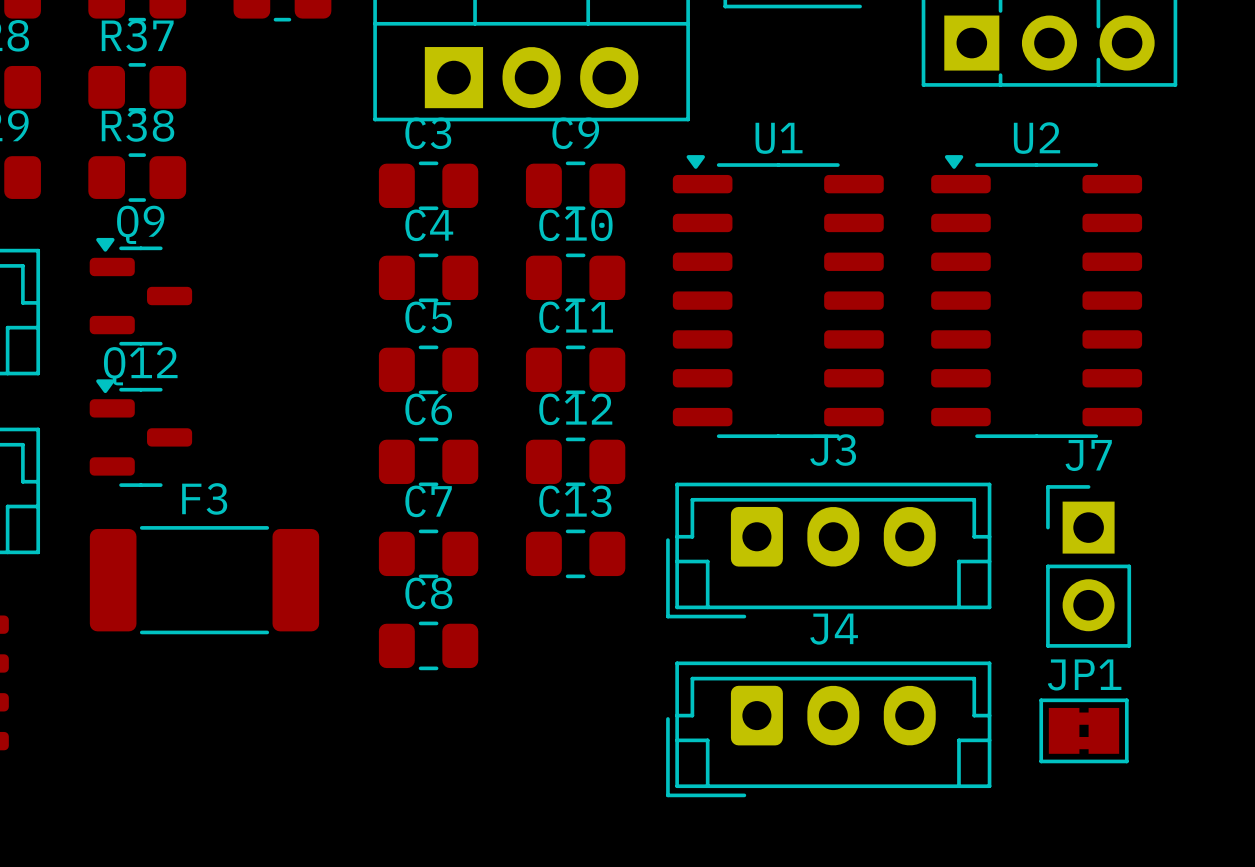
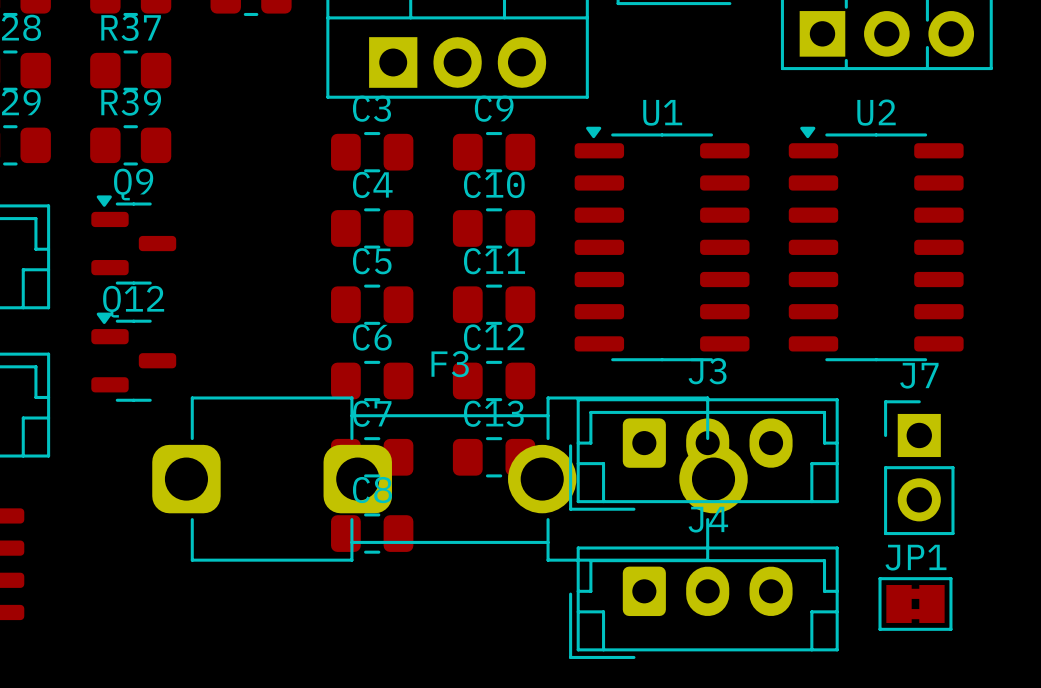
R38 name: R38 (138, 125) -> R39 (131, 102)
F3 footprint: [89, 526, 320, 635] -> [152, 396, 748, 562]

